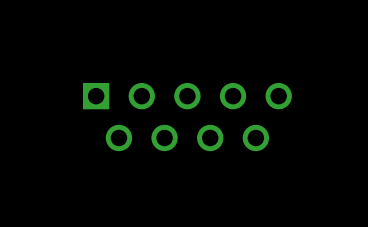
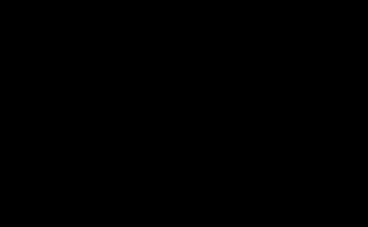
part: (187, 117) -> none

